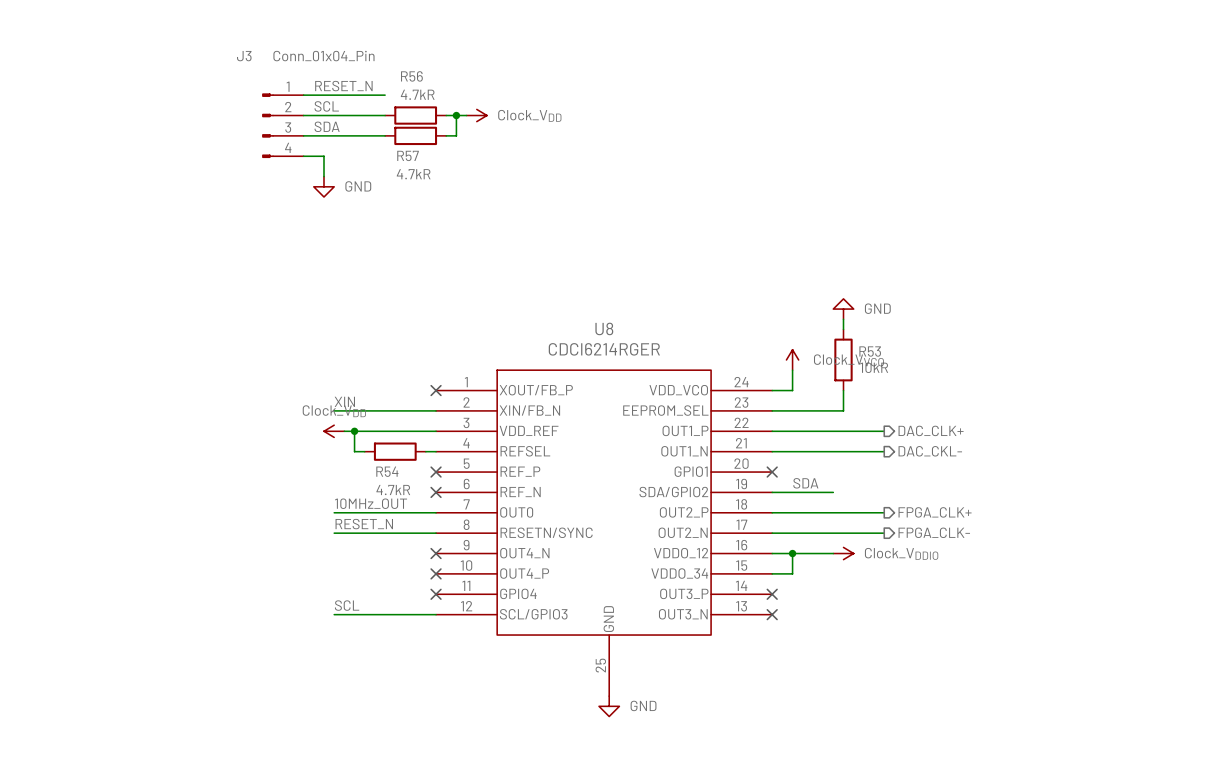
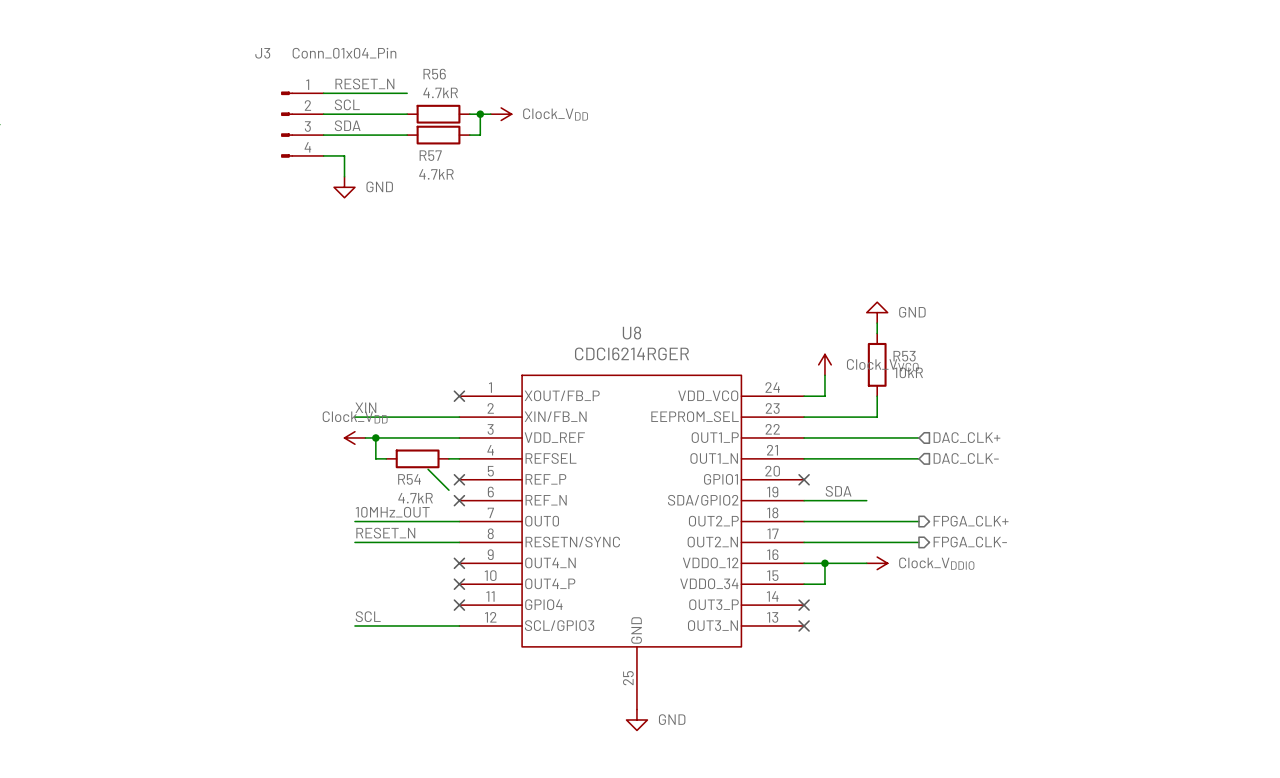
hierarchical label shape: output (931, 430) -> input (966, 437)
hierarchical label shape: output (930, 451) -> input (966, 458)
hierarchical label: DAC_CKL- (930, 451) -> DAC_CLK- (966, 458)
wire: none -> (428, 469) (448, 490)

